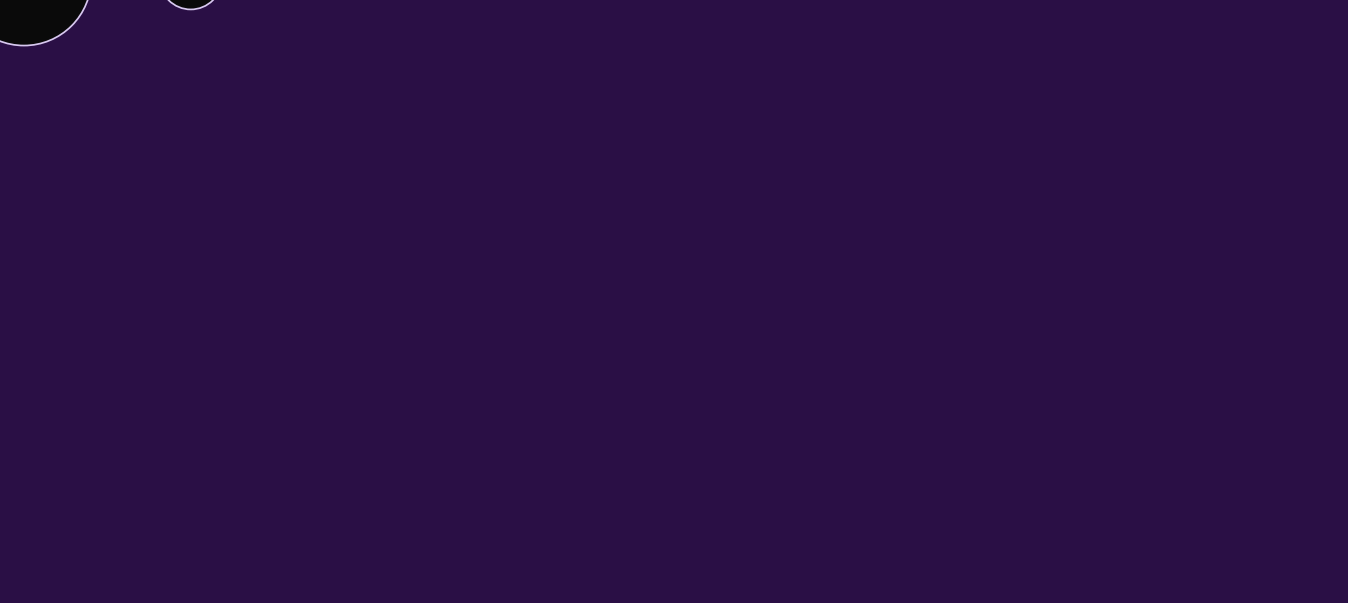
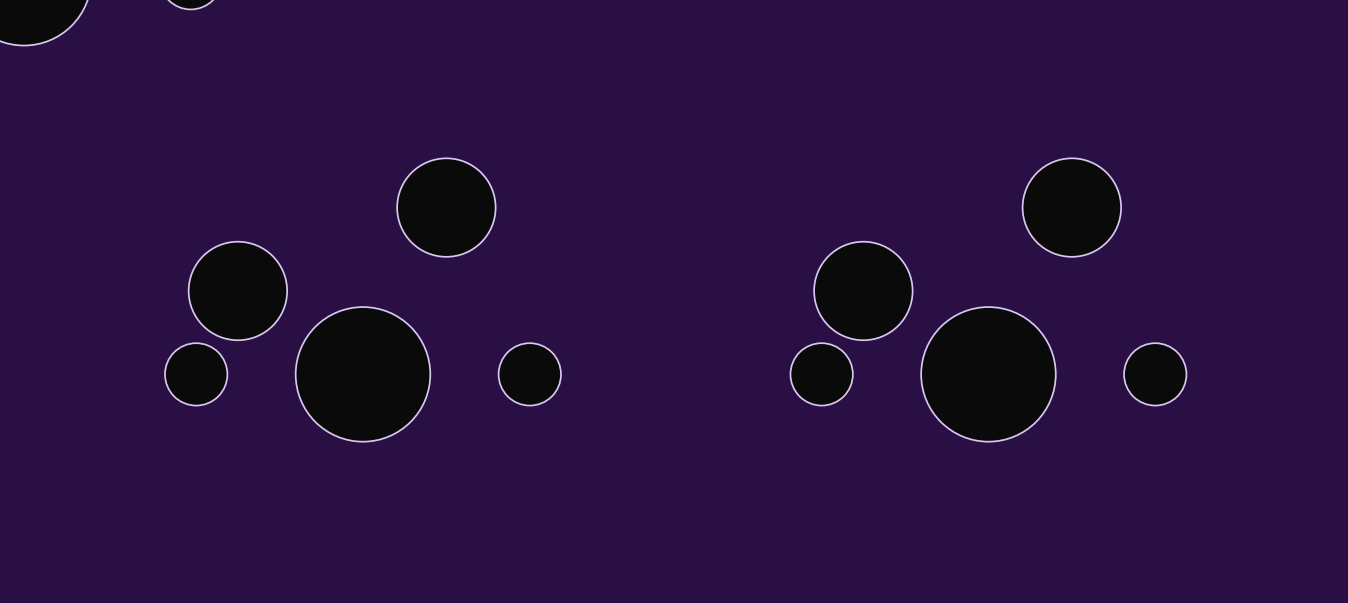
part: none -> (362, 300)
part: none -> (988, 300)

